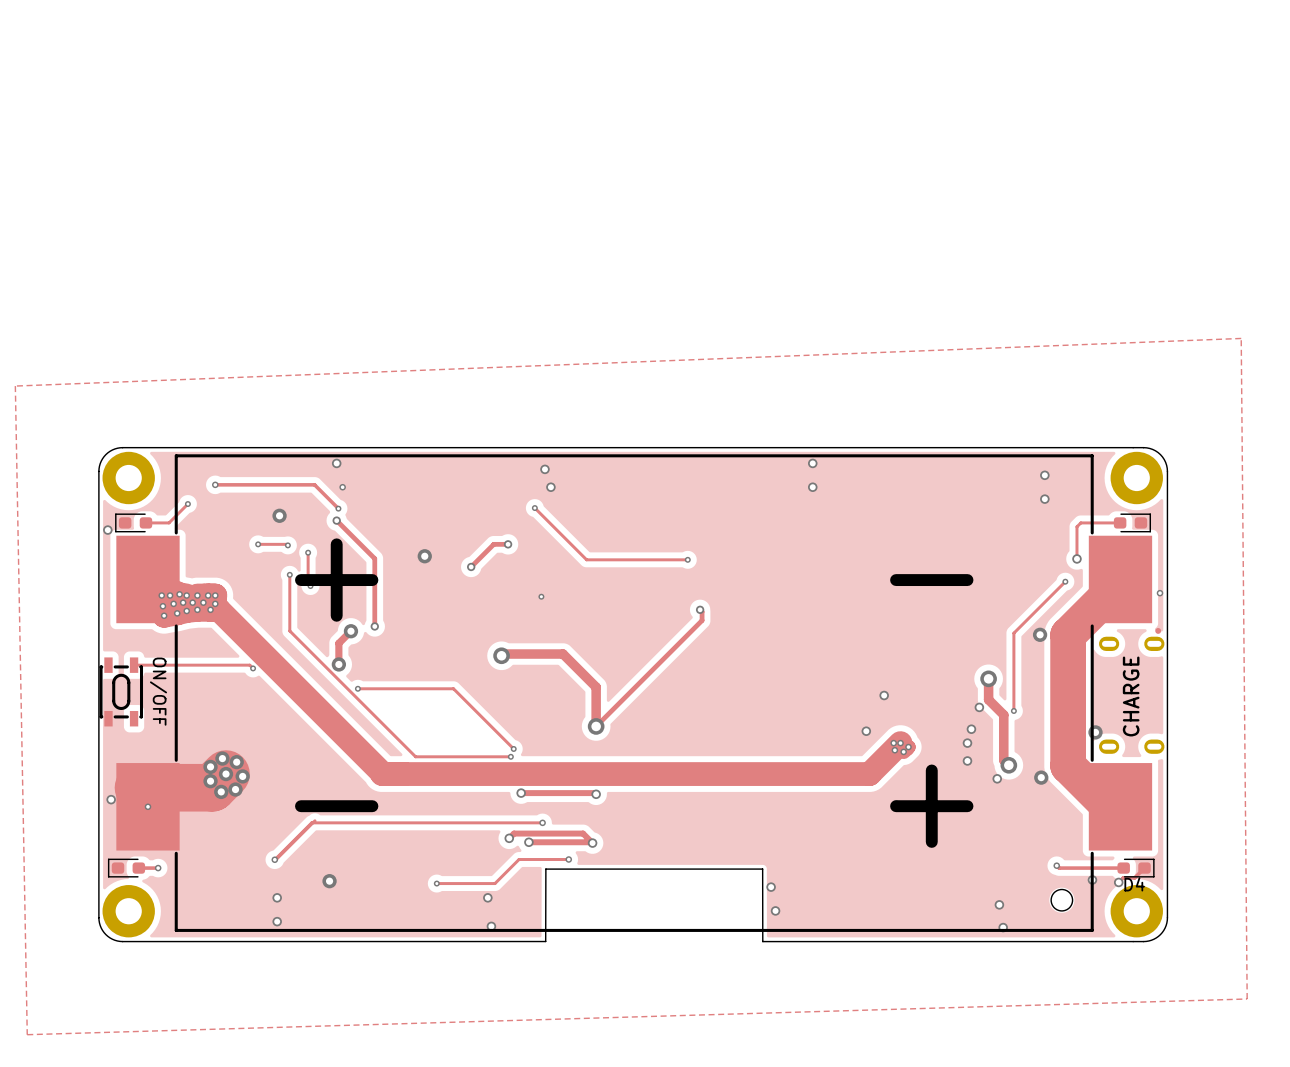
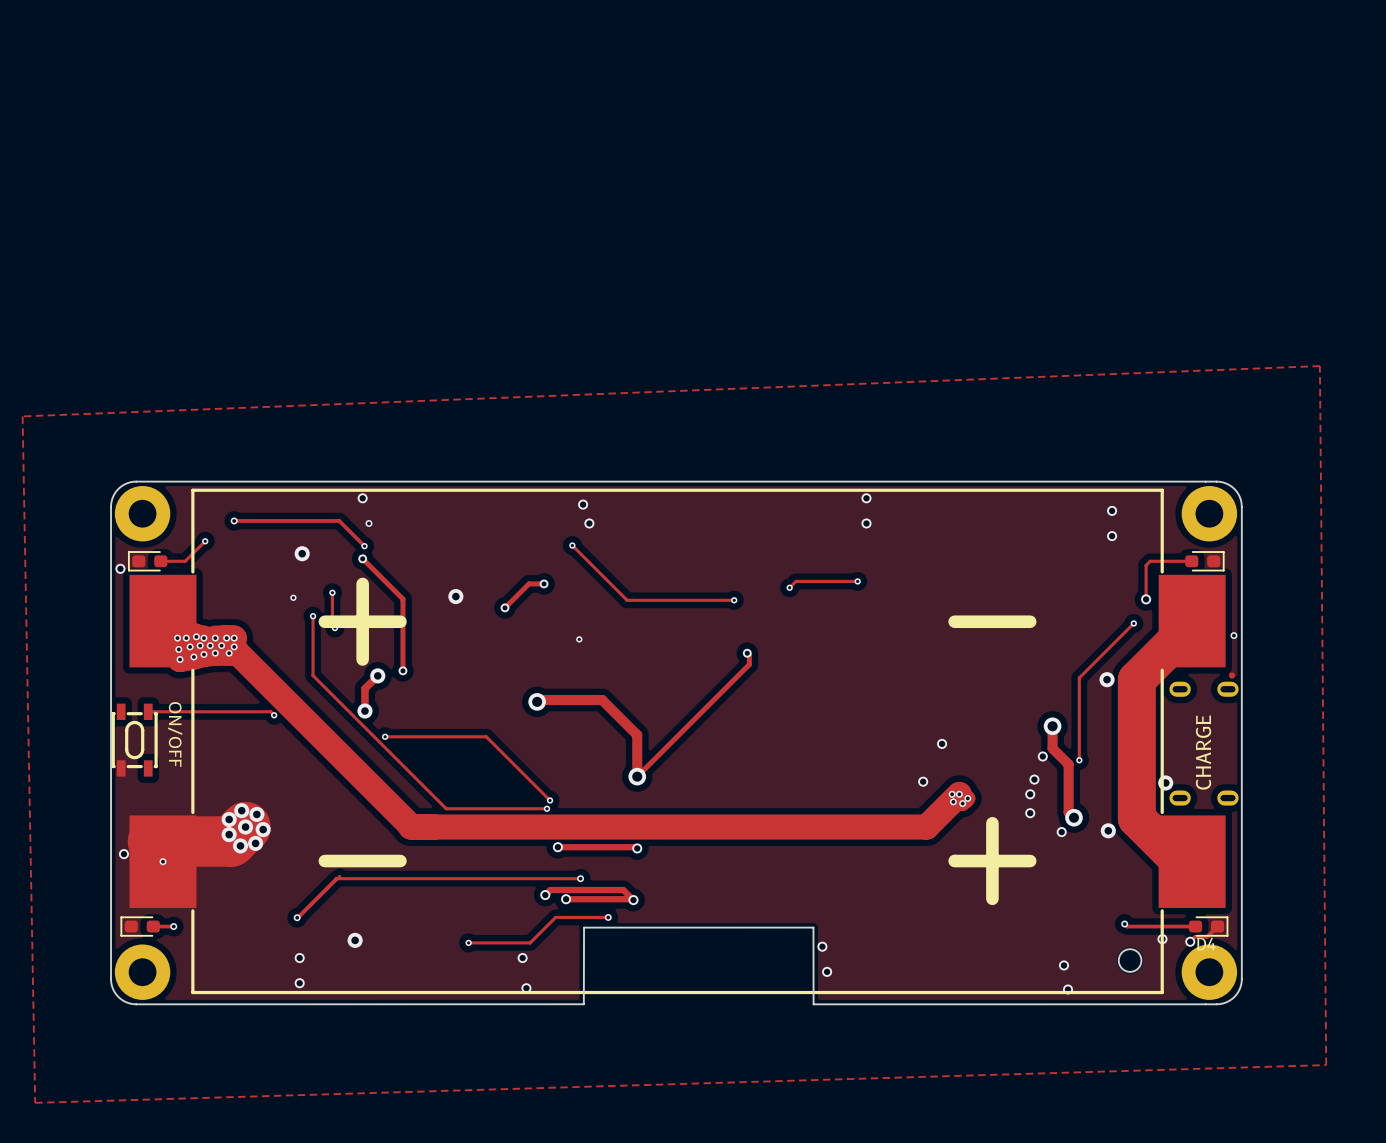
track: none -> (857, 581) (795, 581) (789, 587)
via: none -> (857, 581)
track: (258, 544) (287, 545) -> none
via: (258, 544) -> none
via: (287, 545) -> none
via: none -> (789, 587)
via: none -> (293, 597)

